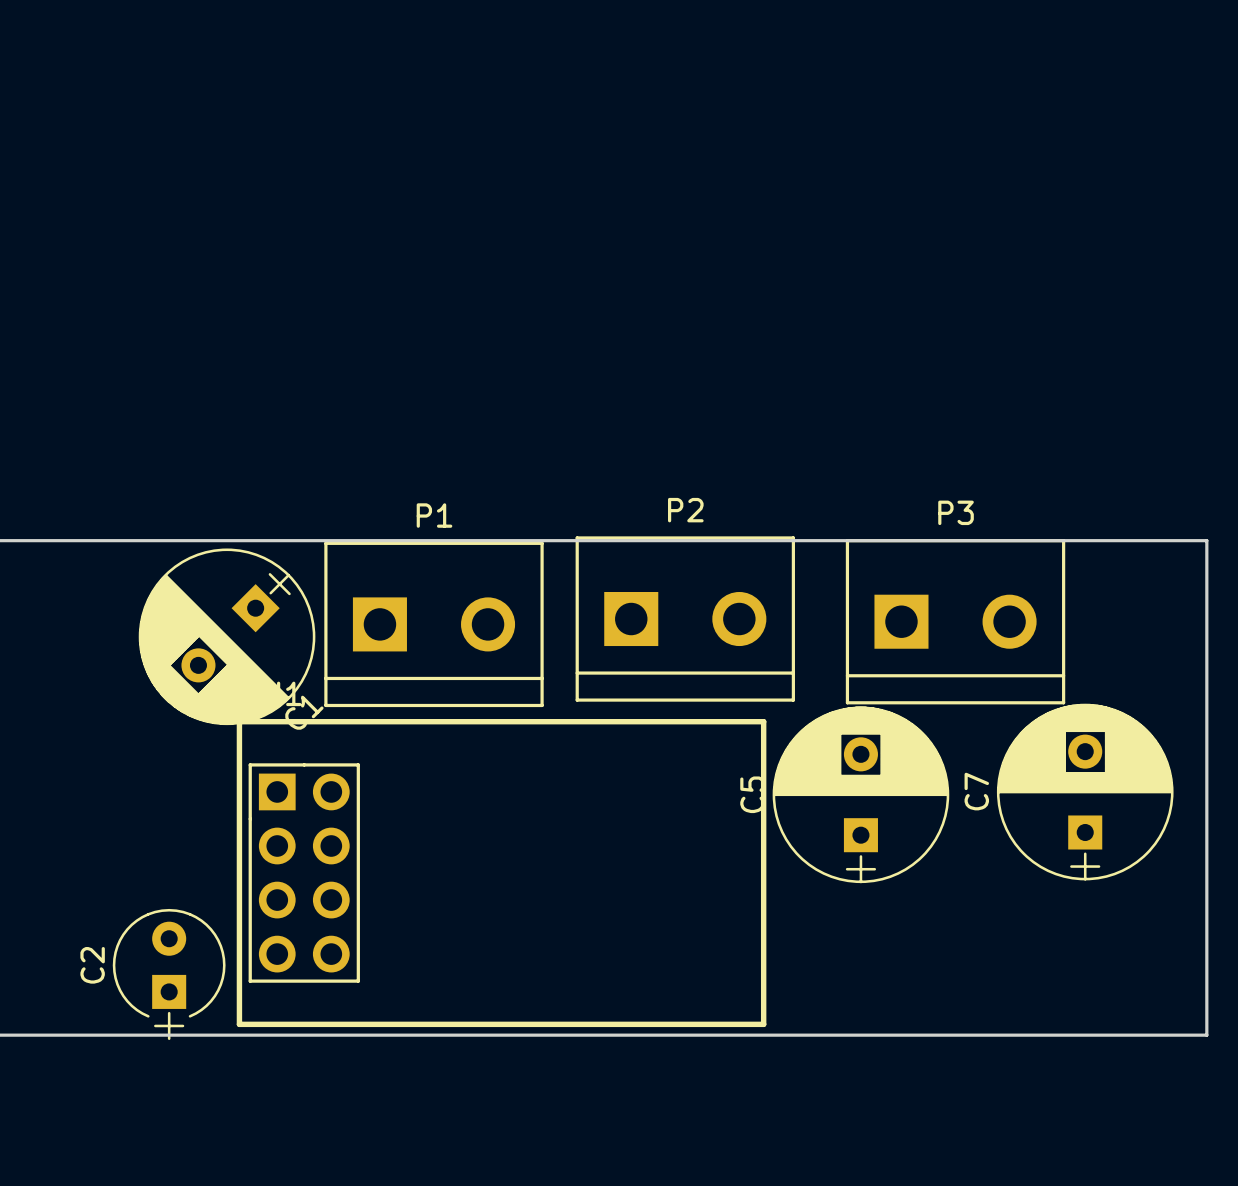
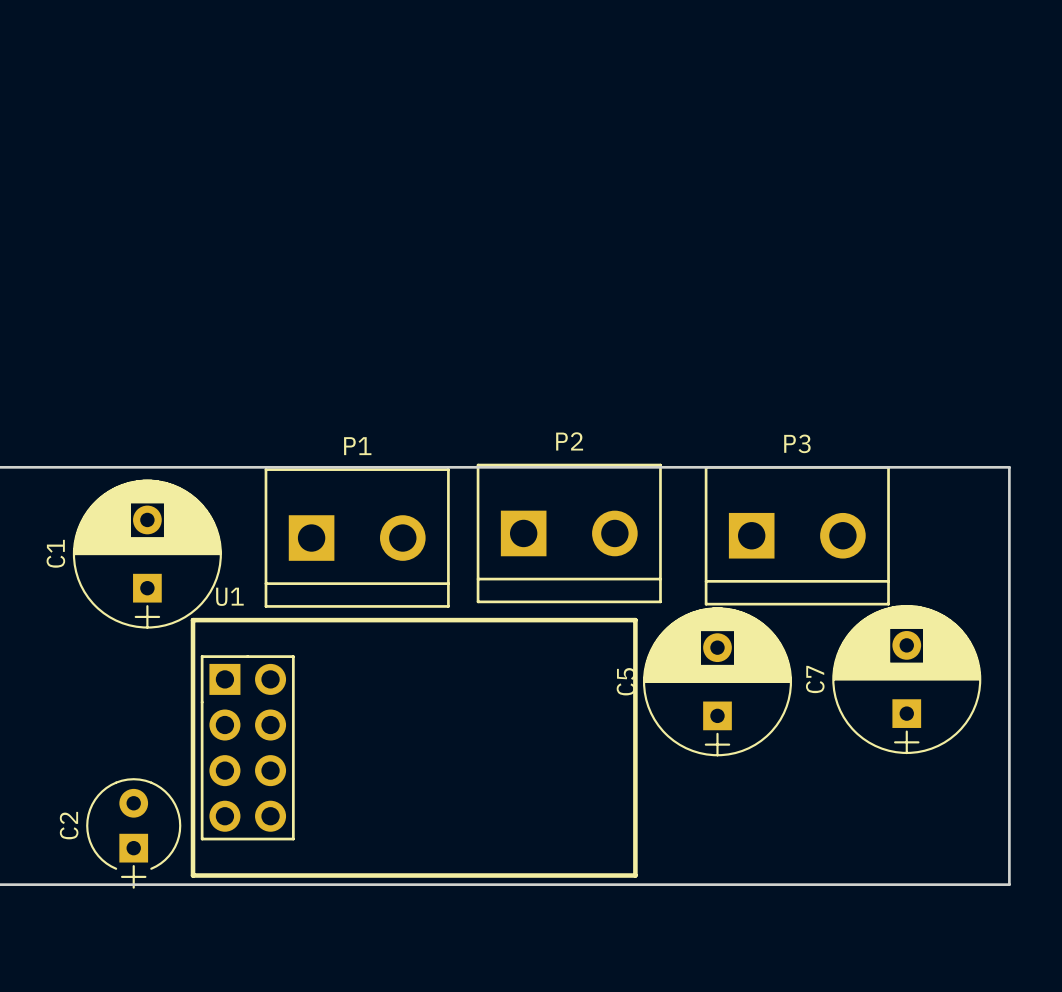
C1 rotation: 0° (227, 636) -> 135° clockwise (147, 554)

